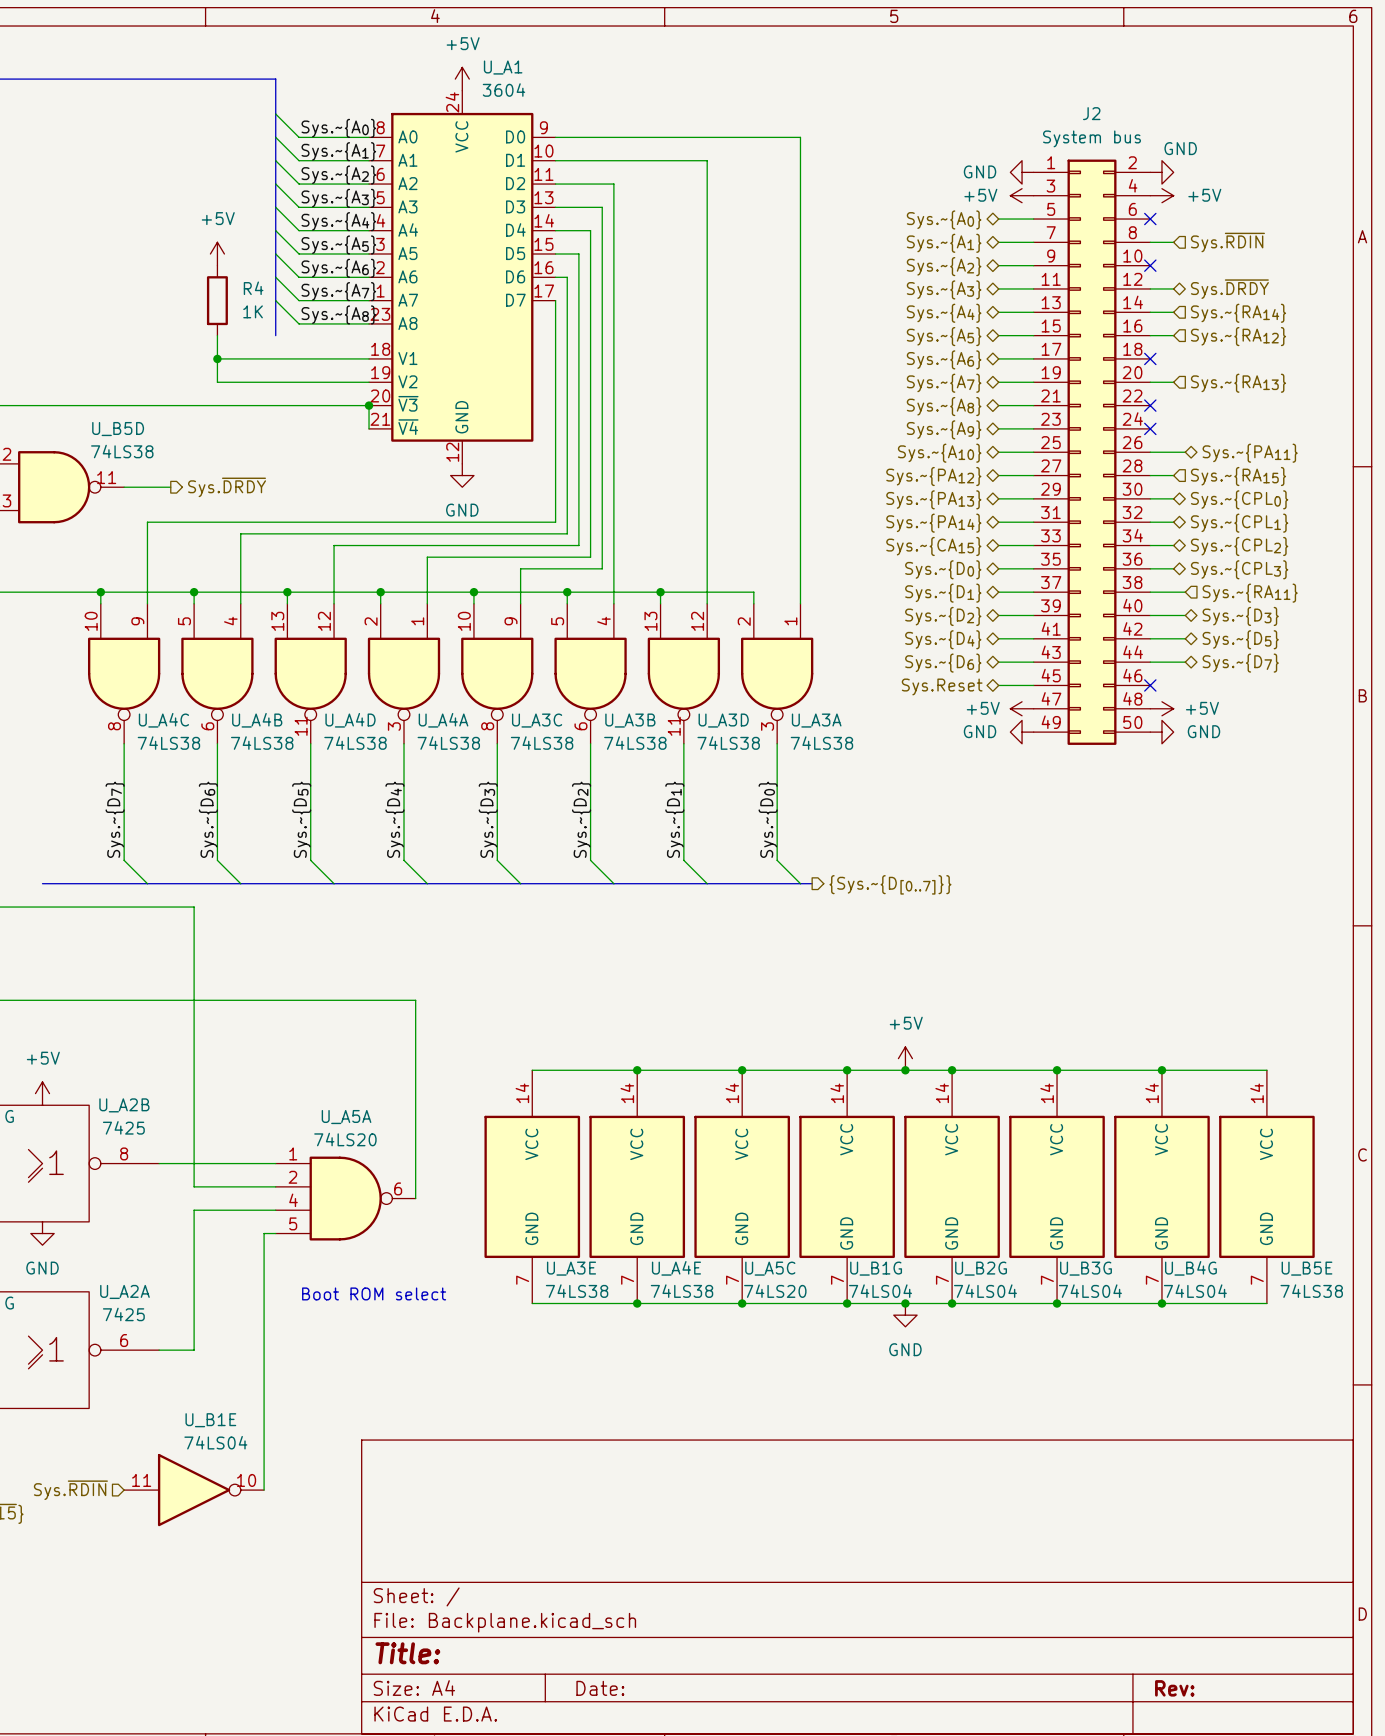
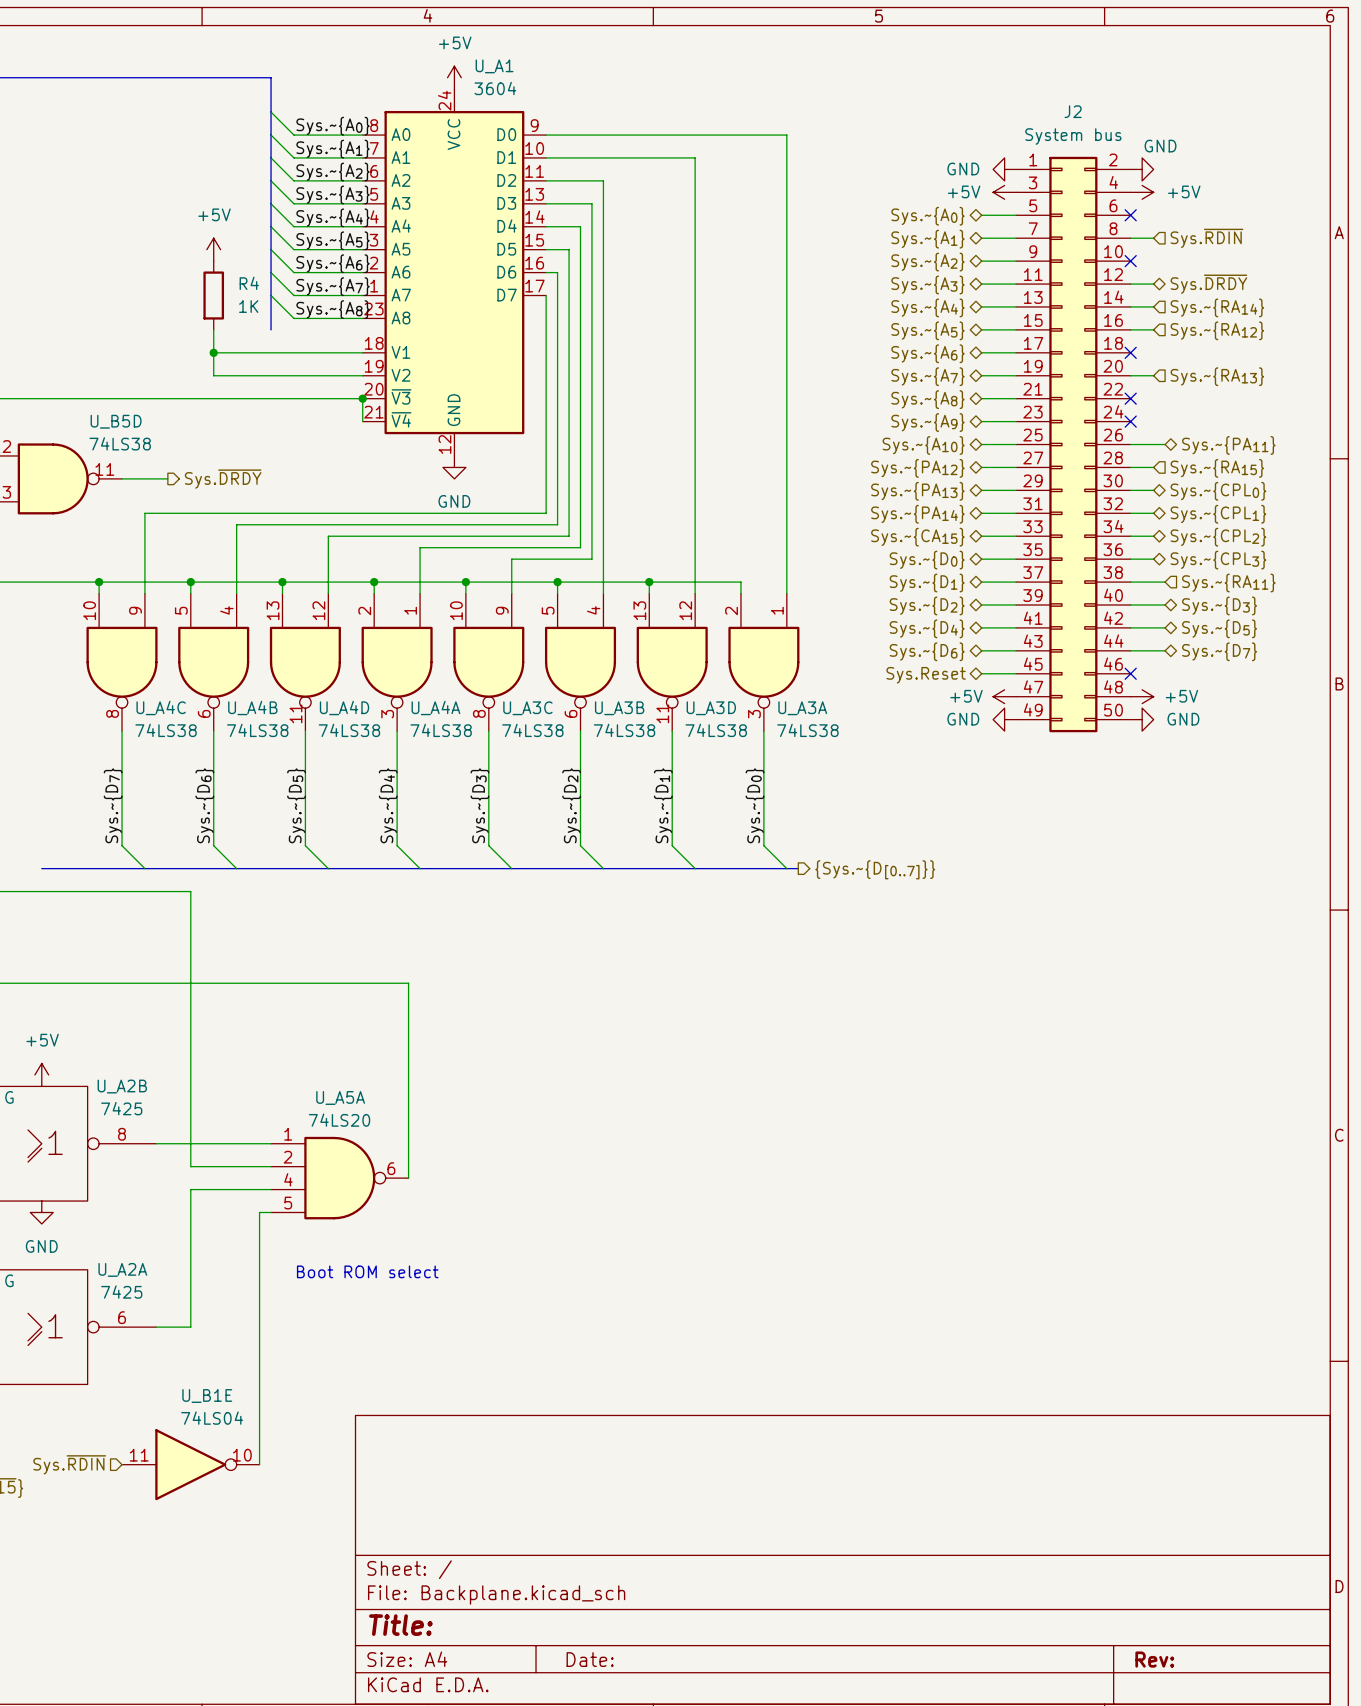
power symbol: +5V (905, 1058) -> none
wire: (532, 1070) (1266, 1070) -> none
junction: (637, 1070) -> none
junction: (742, 1070) -> none
junction: (847, 1070) -> none
junction: (905, 1070) -> none
junction: (952, 1070) -> none
junction: (1057, 1070) -> none
junction: (1161, 1070) -> none
U_A3E: 74LS38 (532, 1186) -> none
U_A4E: 74LS38 (637, 1186) -> none
U_A5C: 74LS20 (742, 1186) -> none
U_B1G: 74LS04 (847, 1186) -> none
U_B2G: 74LS04 (952, 1186) -> none
U_B3G: 74LS04 (1057, 1186) -> none
U_B4G: 74LS04 (1161, 1186) -> none
U_B5E: 74LS38 (1266, 1186) -> none
wire: (532, 1303) (1266, 1303) -> none
junction: (637, 1303) -> none
junction: (742, 1303) -> none
junction: (847, 1303) -> none
junction: (905, 1303) -> none
junction: (952, 1303) -> none
junction: (1057, 1303) -> none
junction: (1161, 1303) -> none
power symbol: GND (905, 1315) -> none

